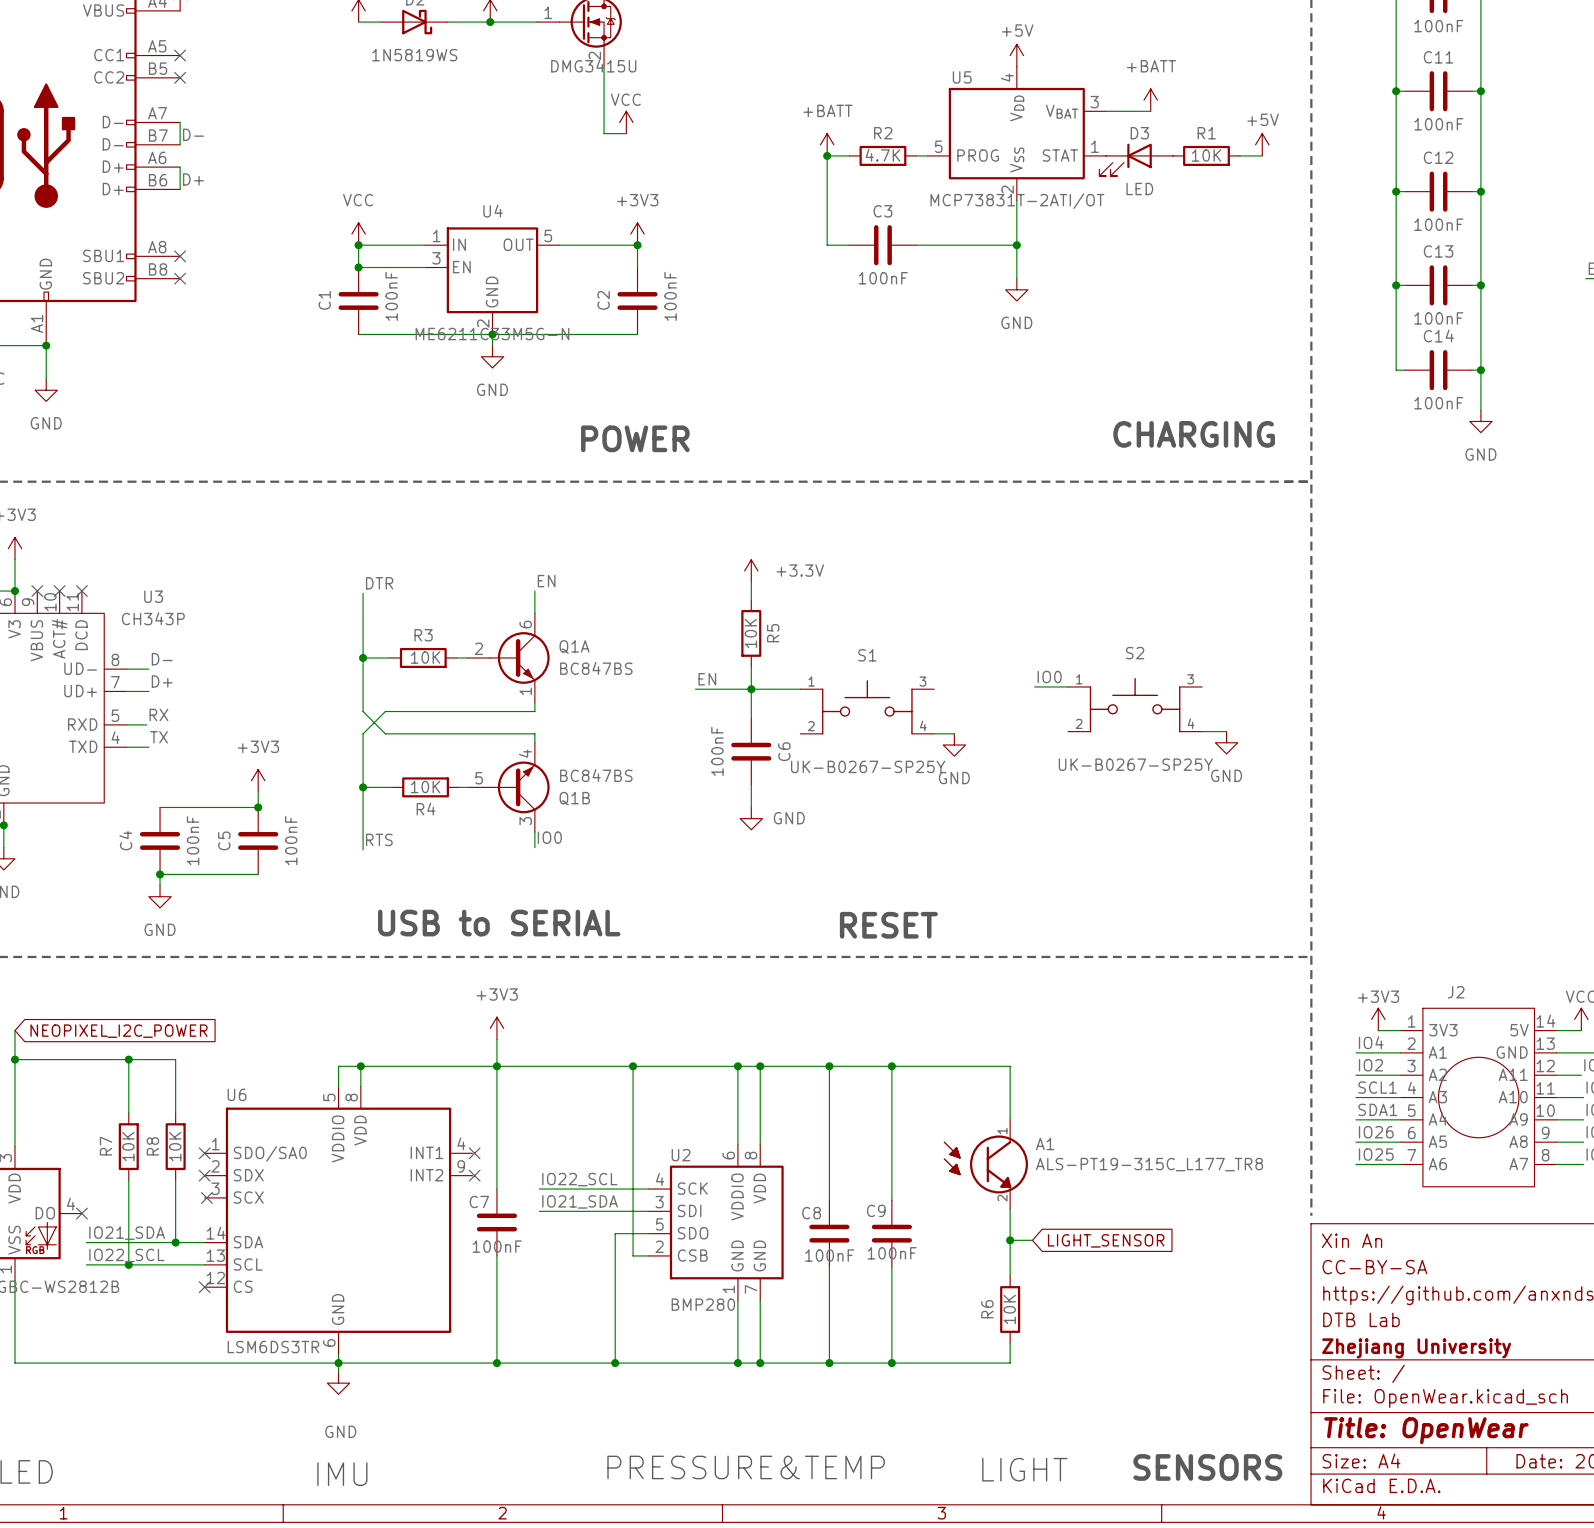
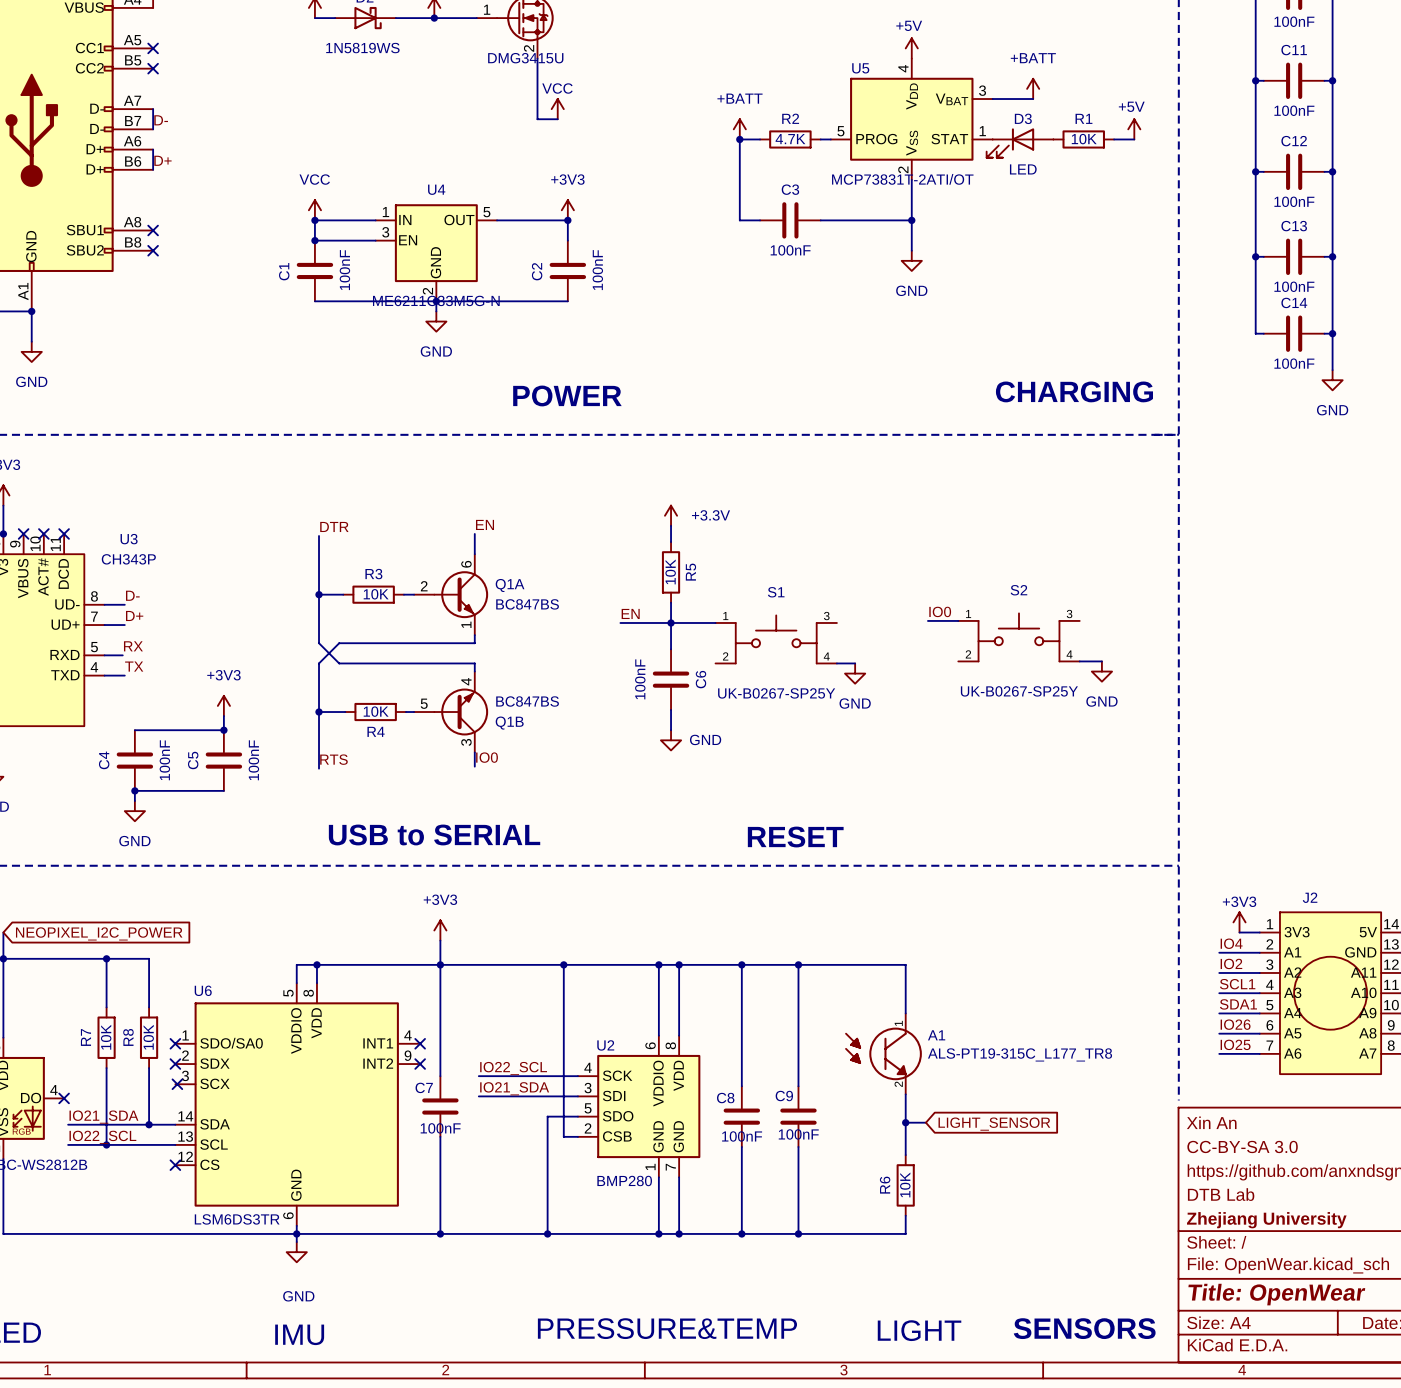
title block: CC-BY-SA (1374, 1267) -> CC-BY-SA 3.0 (1242, 1146)

